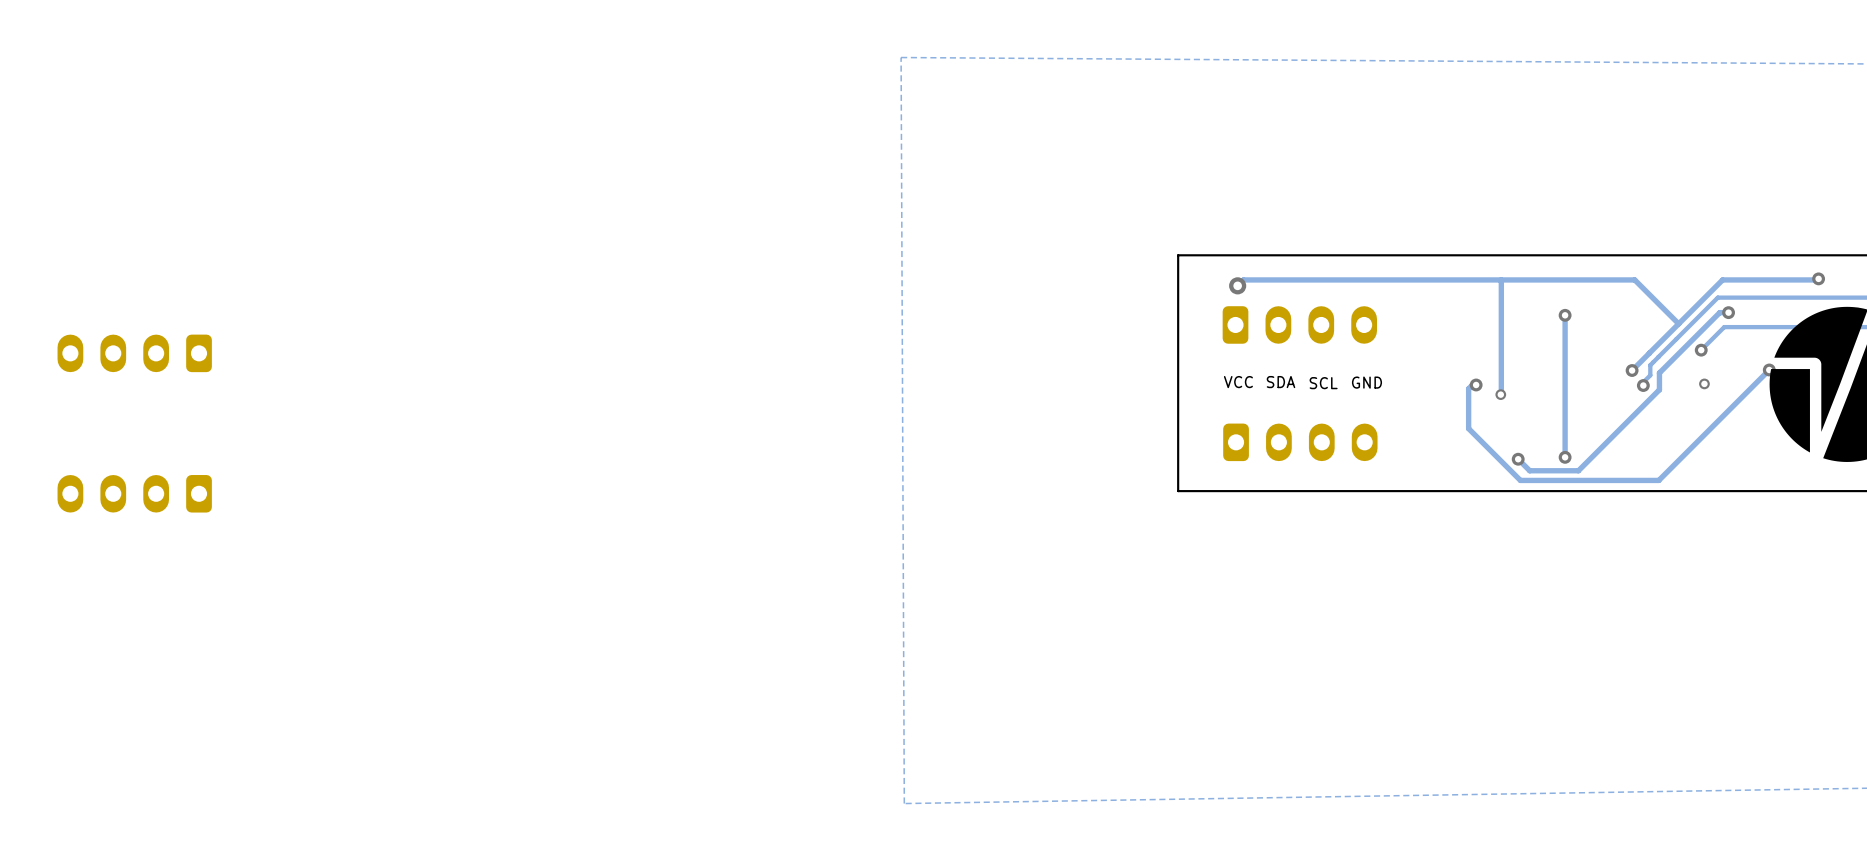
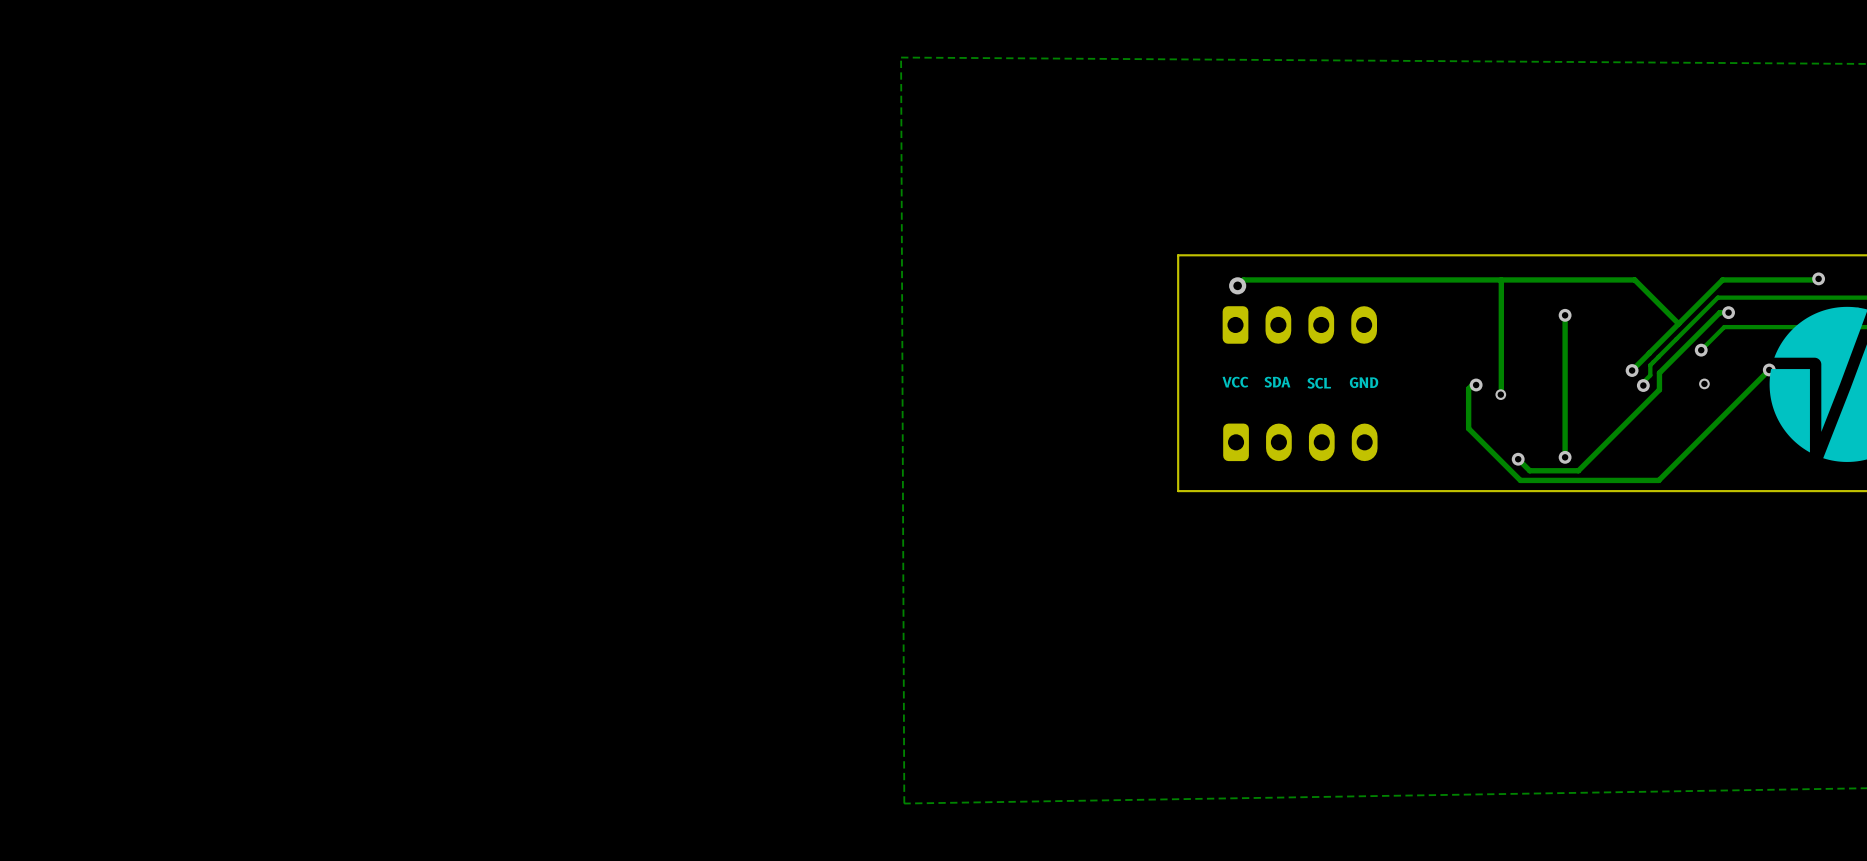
part: (134, 353) -> none
part: (134, 493) -> none

